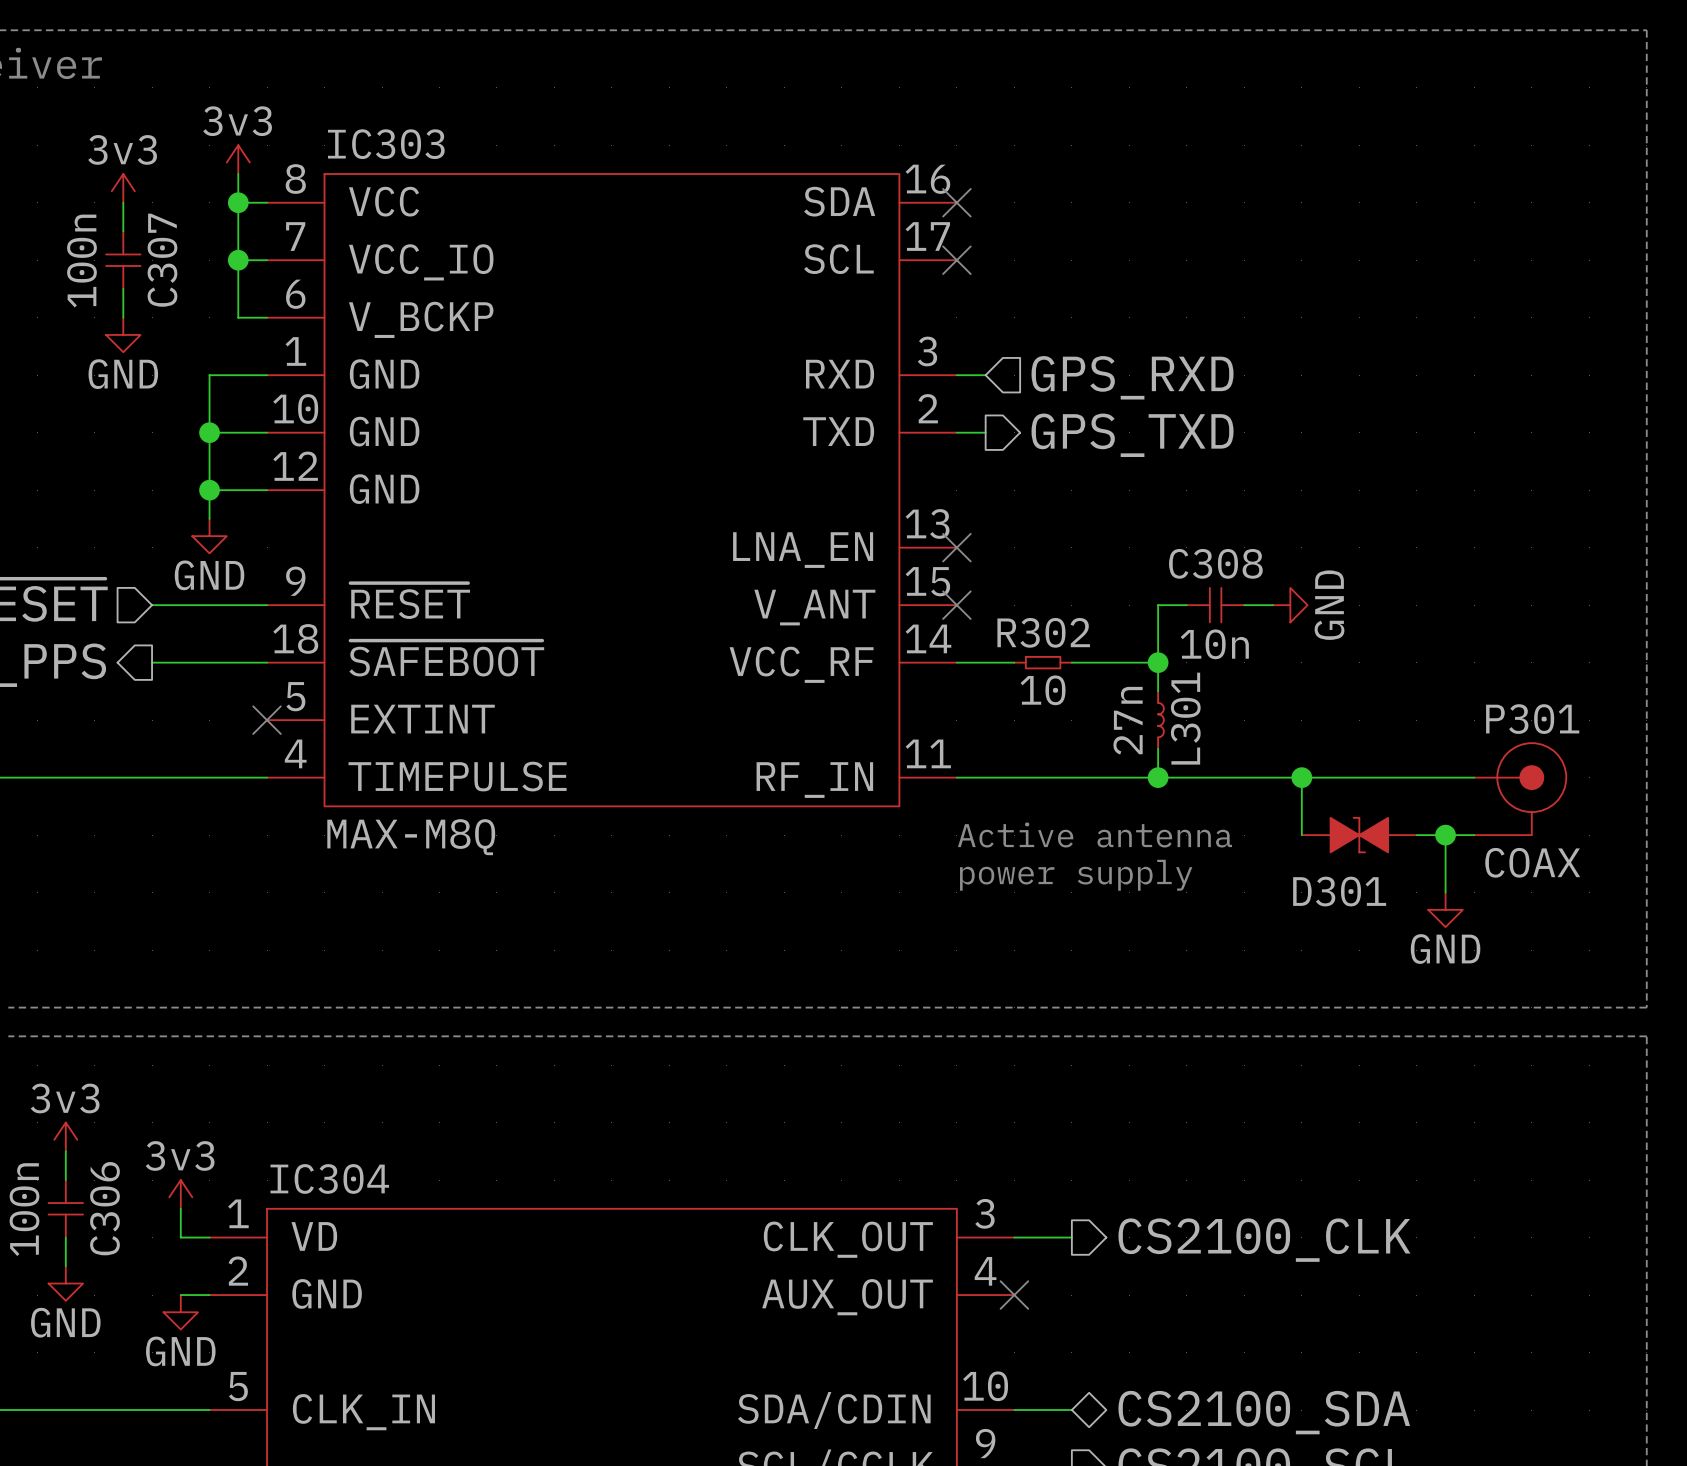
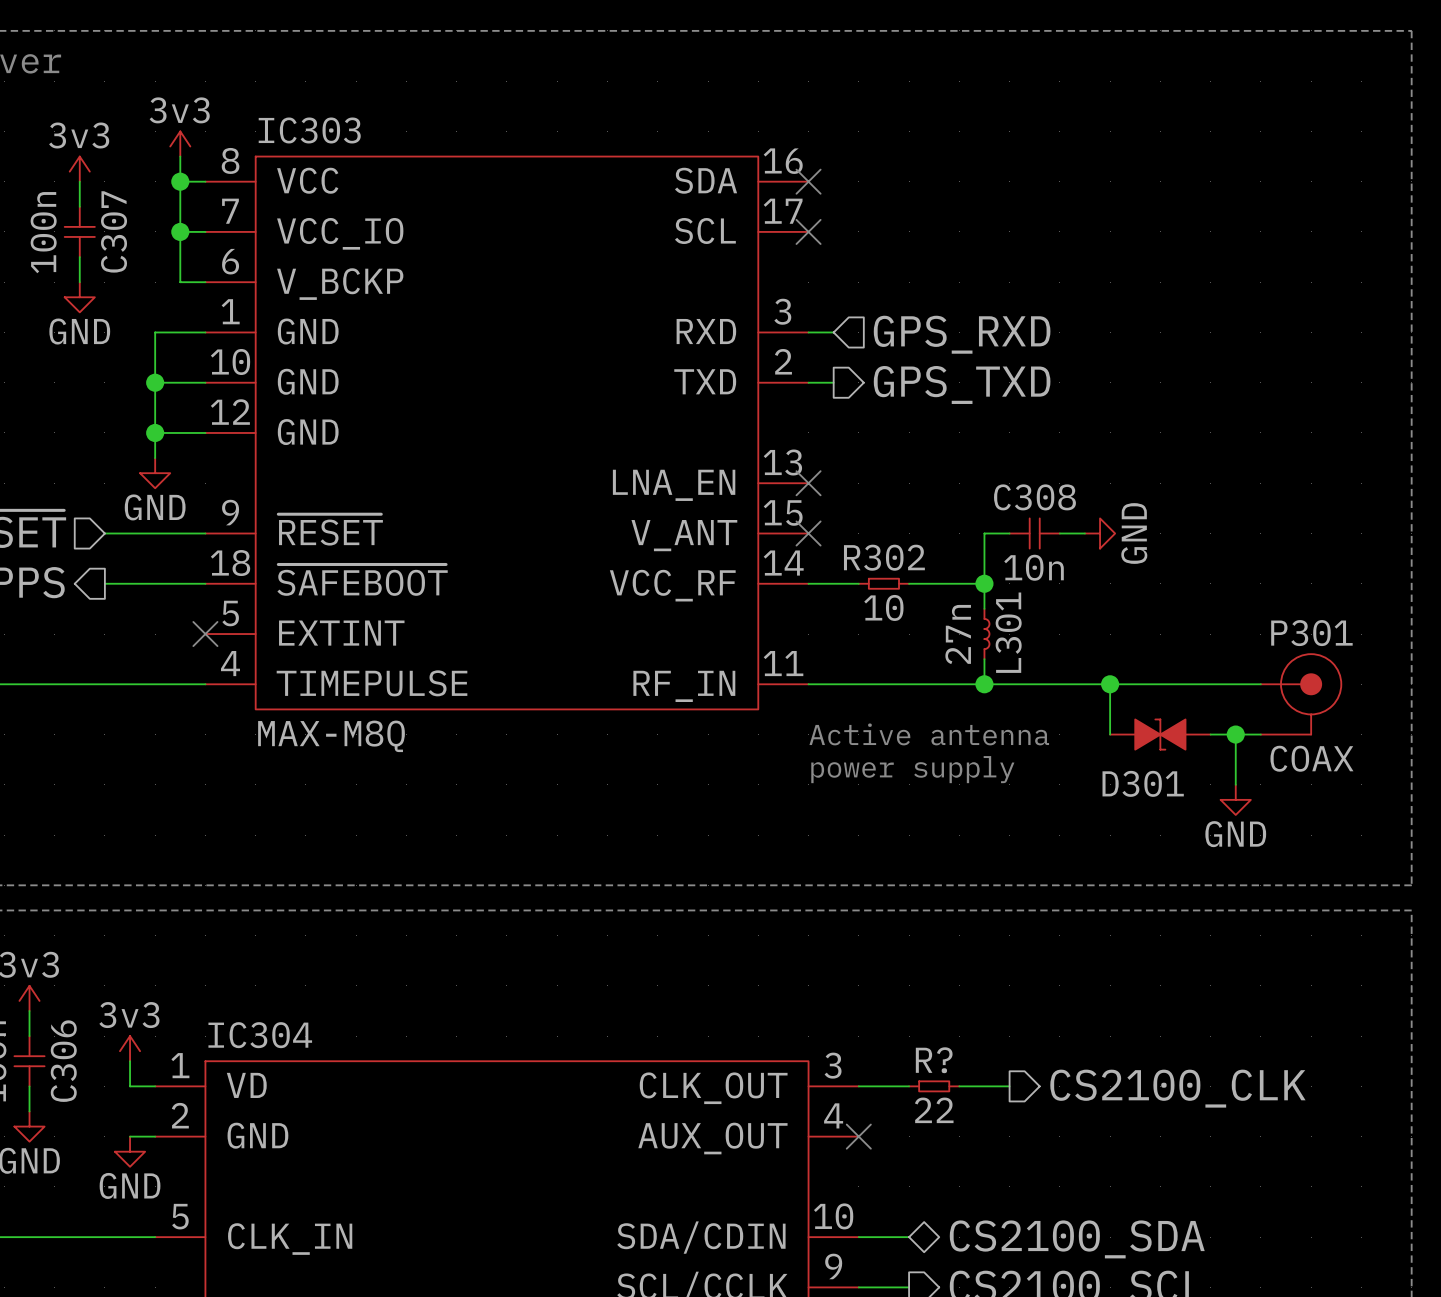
R?: none -> 22 (934, 1086)
wire: none -> (959, 1086) (1009, 1086)
hierarchical label position: CS2100_CLK (1264, 1240) -> CS2100_CLK (1177, 1088)

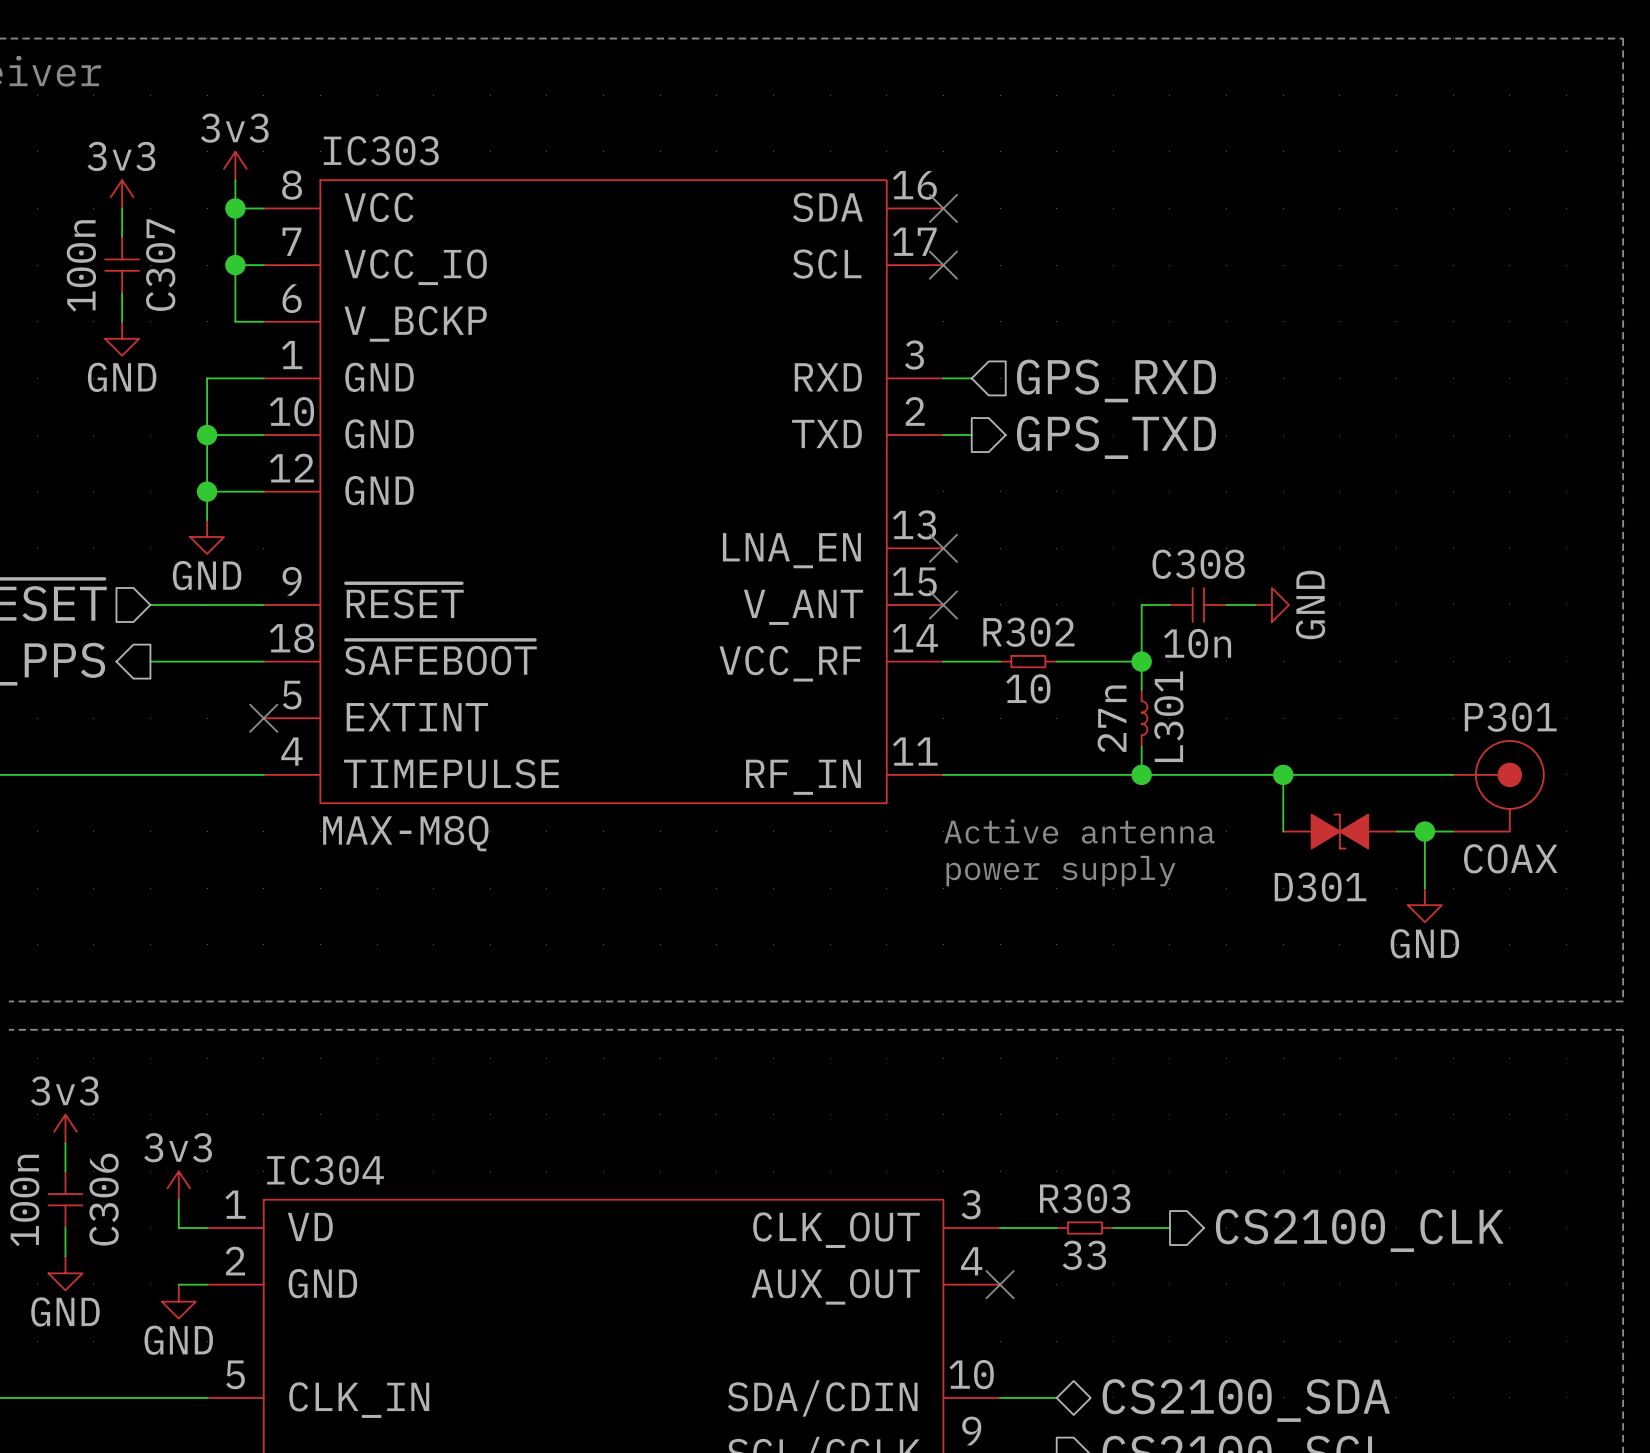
R? name: R? (934, 1060) -> R303 (1085, 1198)
R? value: 22 (934, 1110) -> 33 (1084, 1255)

